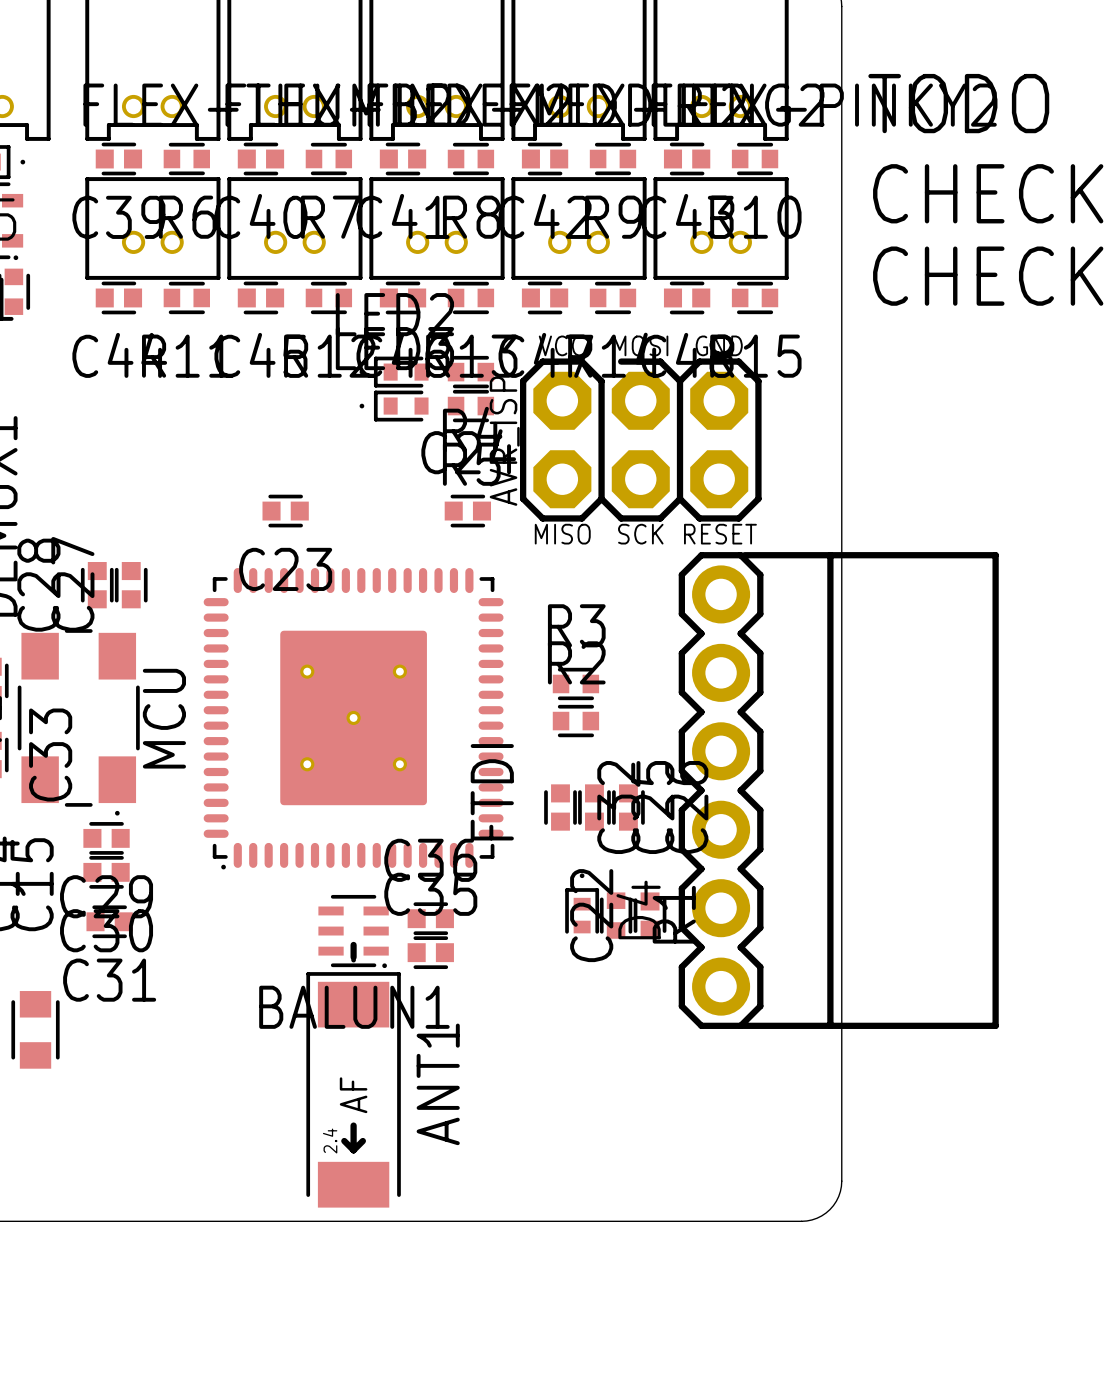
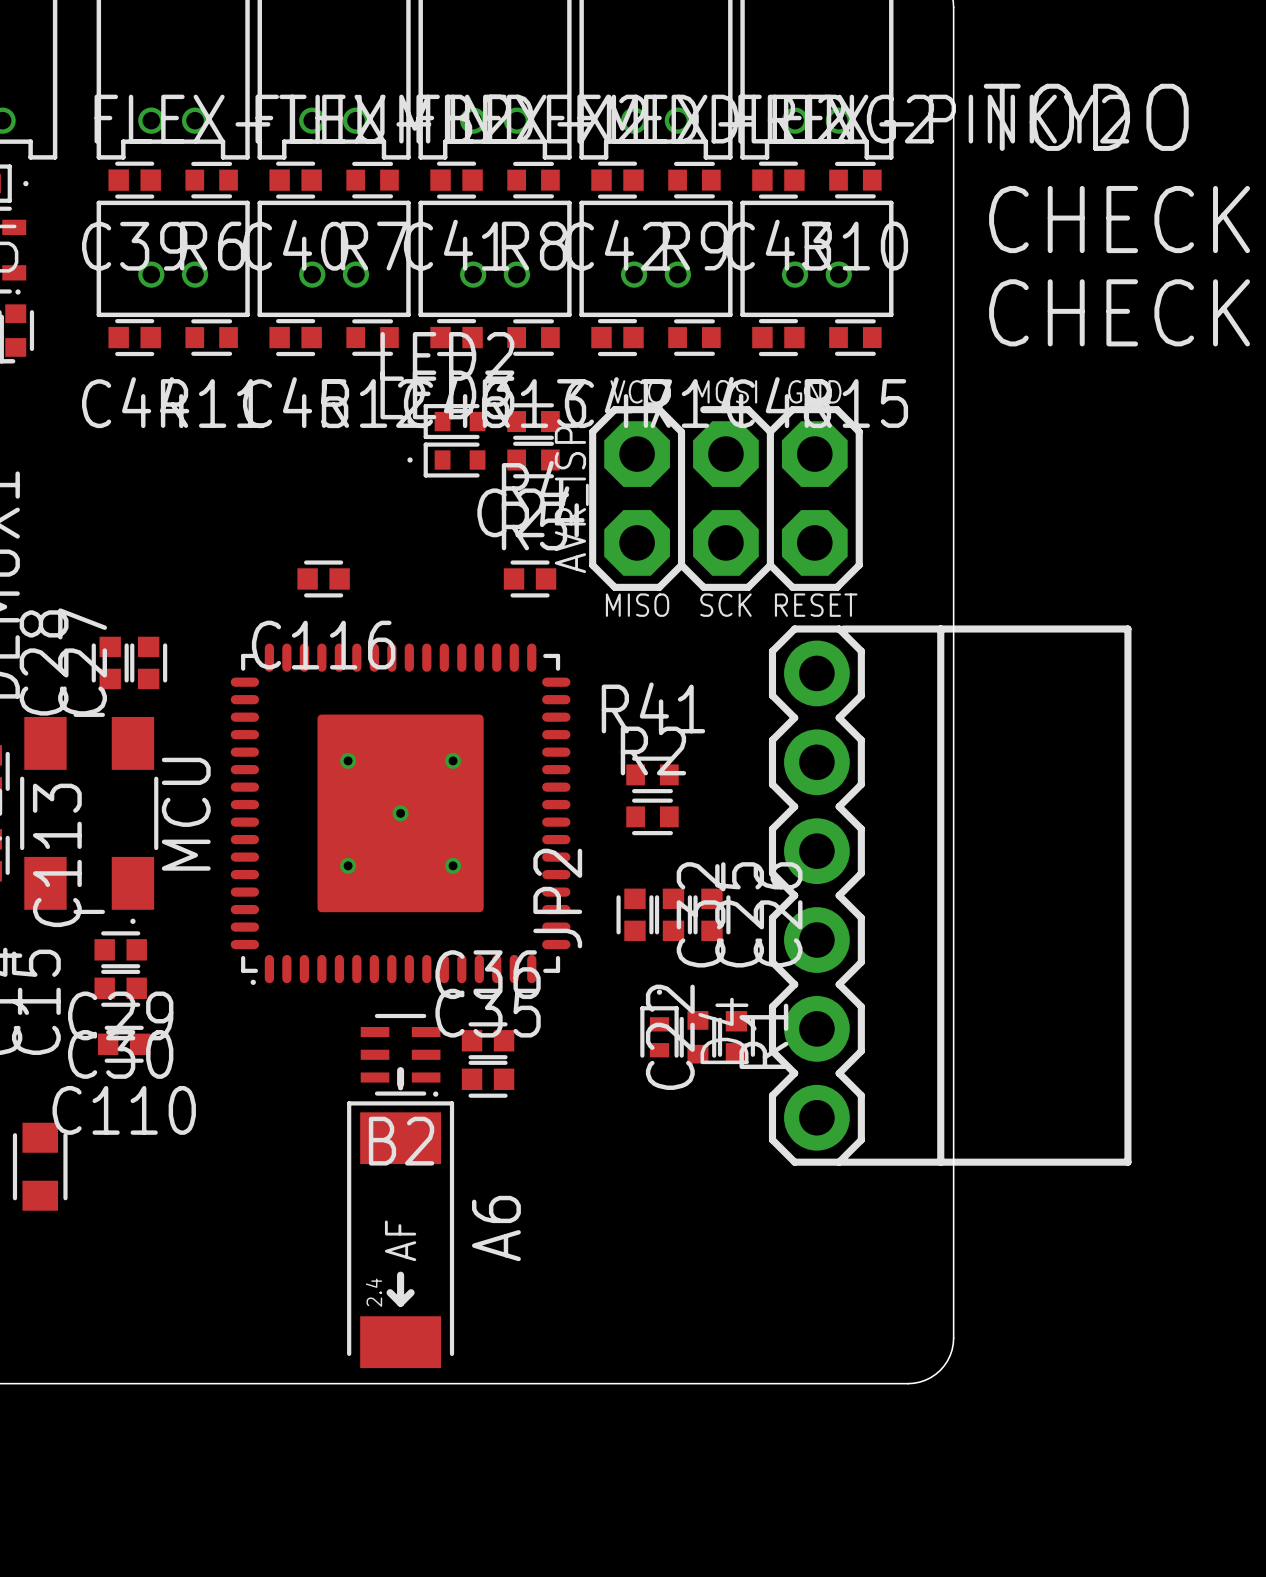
C23 name: C23 (285, 569) -> C116 (323, 645)
R3 name: R3 (576, 625) -> R41 (653, 707)
C33 name: C33 (50, 755) -> C113 (57, 855)
FTDI name: FTDI (492, 792) -> JP2 (557, 898)
C31 name: C31 (109, 980) -> C110 (124, 1110)
BALUN1 name: BALUN1 (354, 1007) -> B2 (401, 1141)
ANT1 name: ANT1 (438, 1084) -> A6 (496, 1228)

